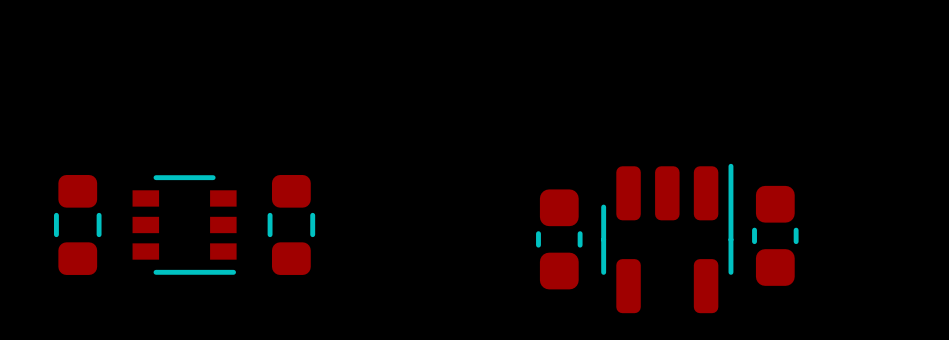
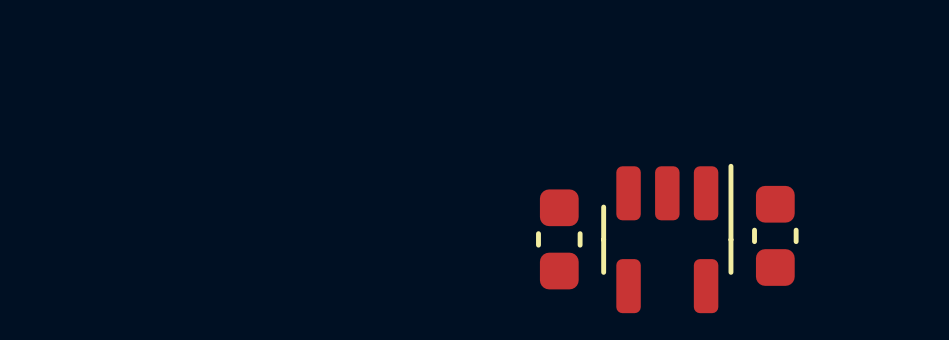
part: (77, 224) -> none
part: (184, 224) -> none
part: (291, 224) -> none

